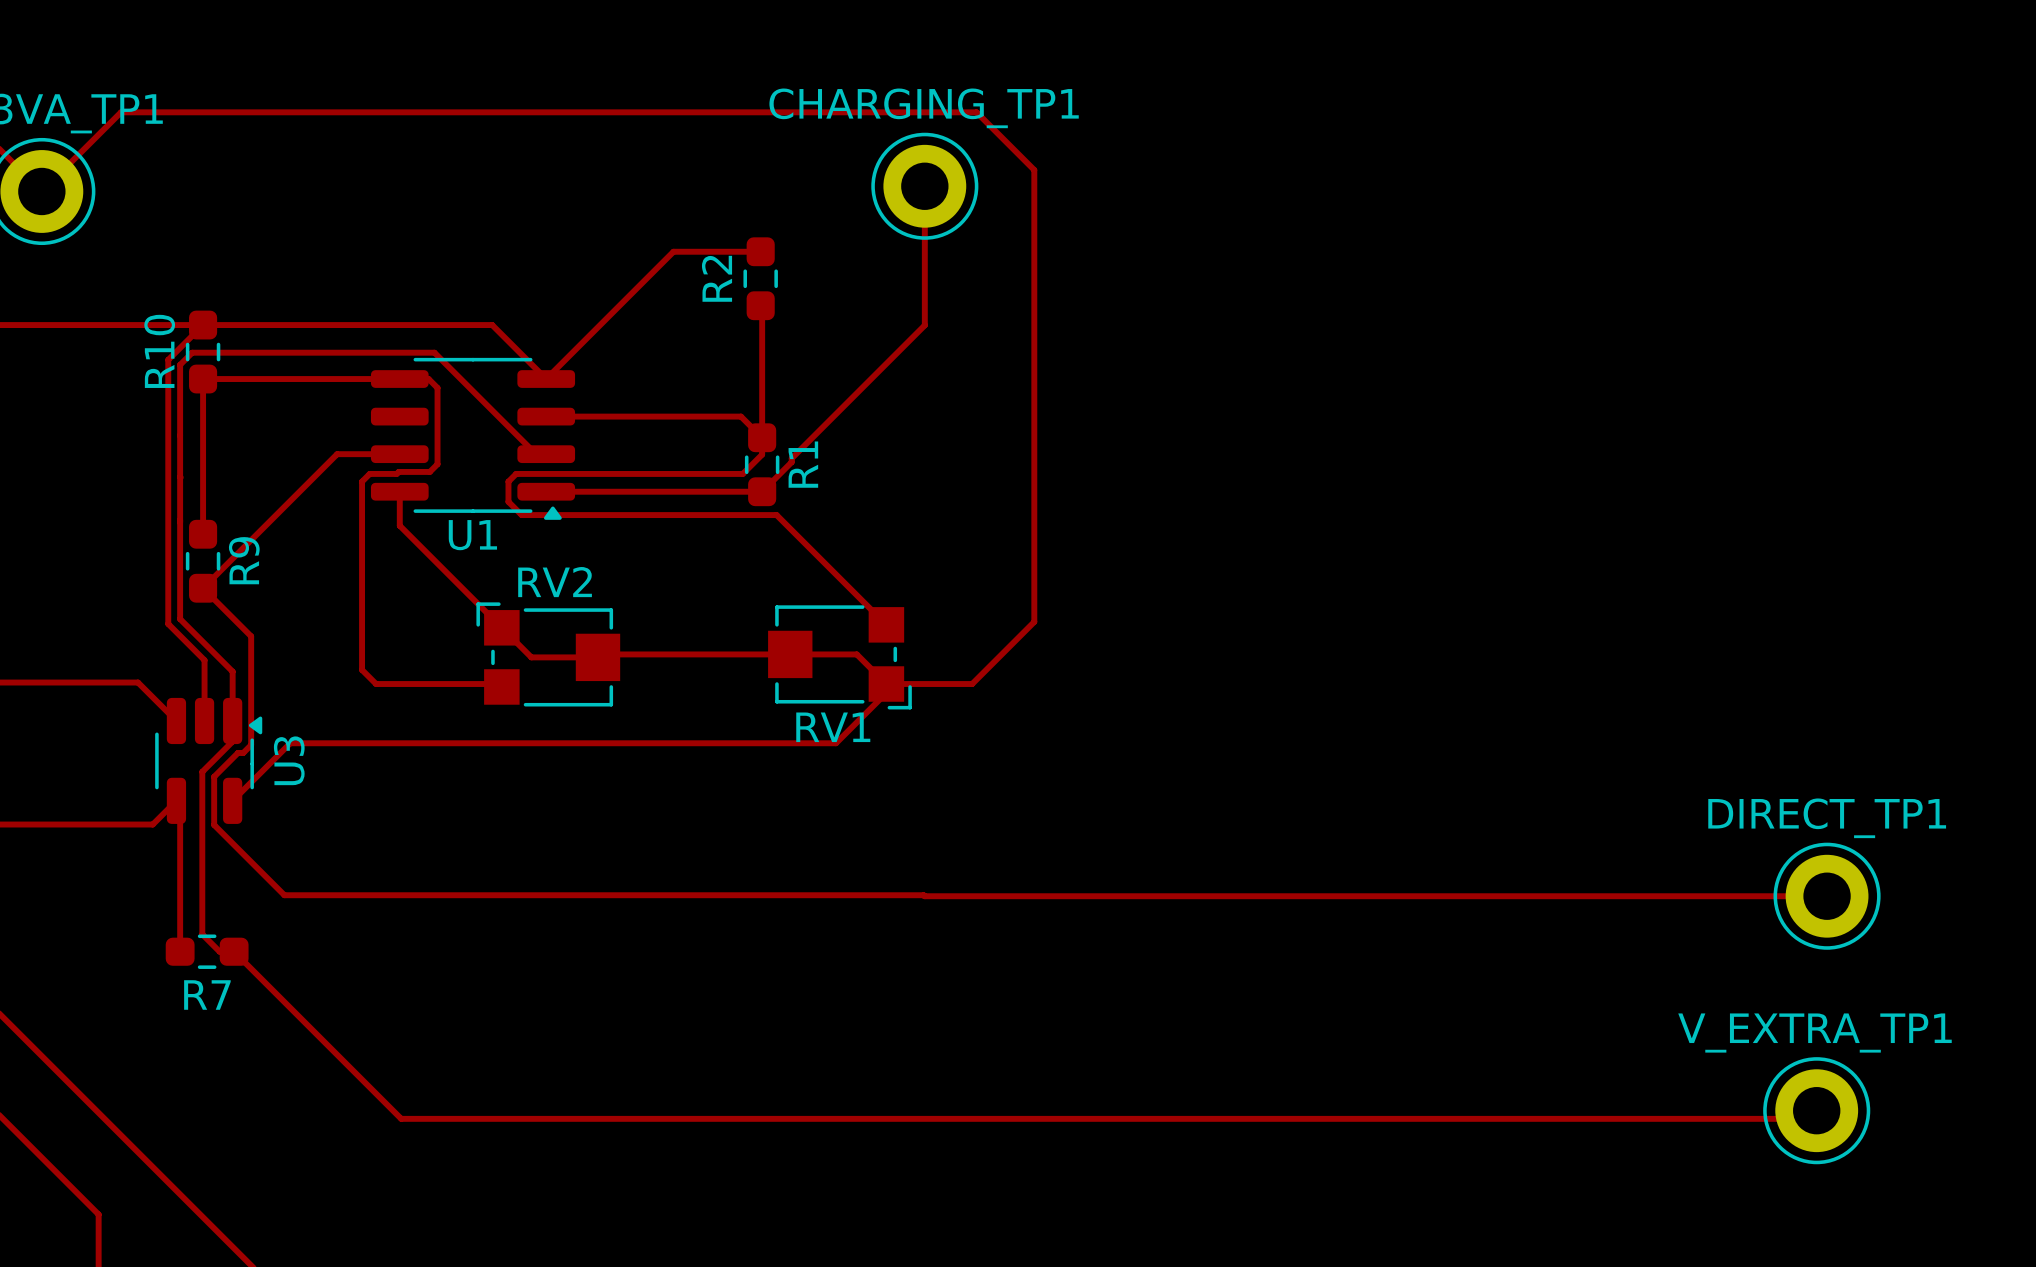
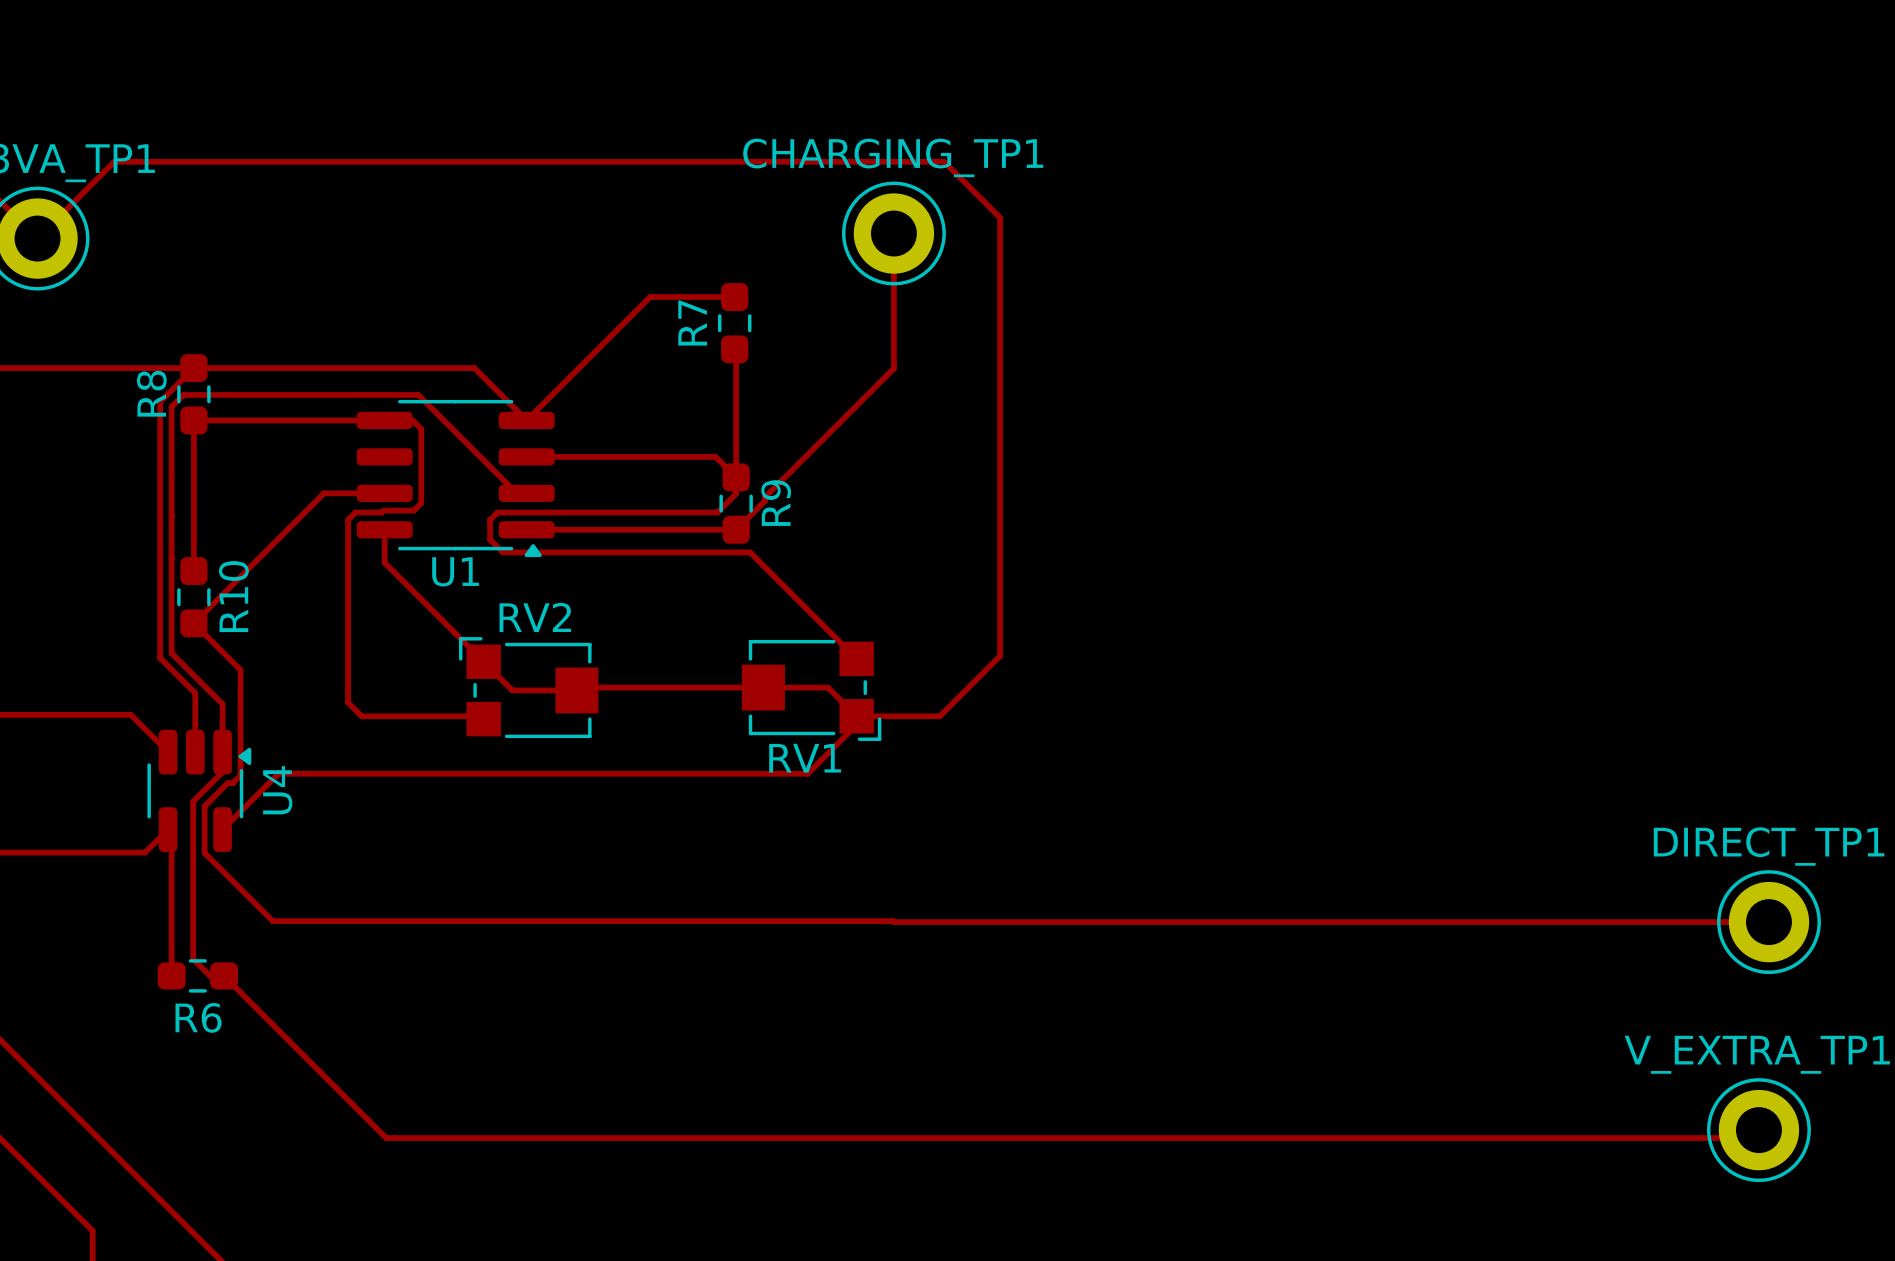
R2 name: R2 (717, 278) -> R7 (692, 322)
R10 name: R10 (159, 351) -> R8 (151, 393)
R1 name: R1 (803, 464) -> R9 (776, 503)
R9 name: R9 (244, 560) -> R10 (233, 596)
U3 name: U3 (289, 760) -> U4 (277, 790)
R7 name: R7 (207, 994) -> R6 (198, 1017)

